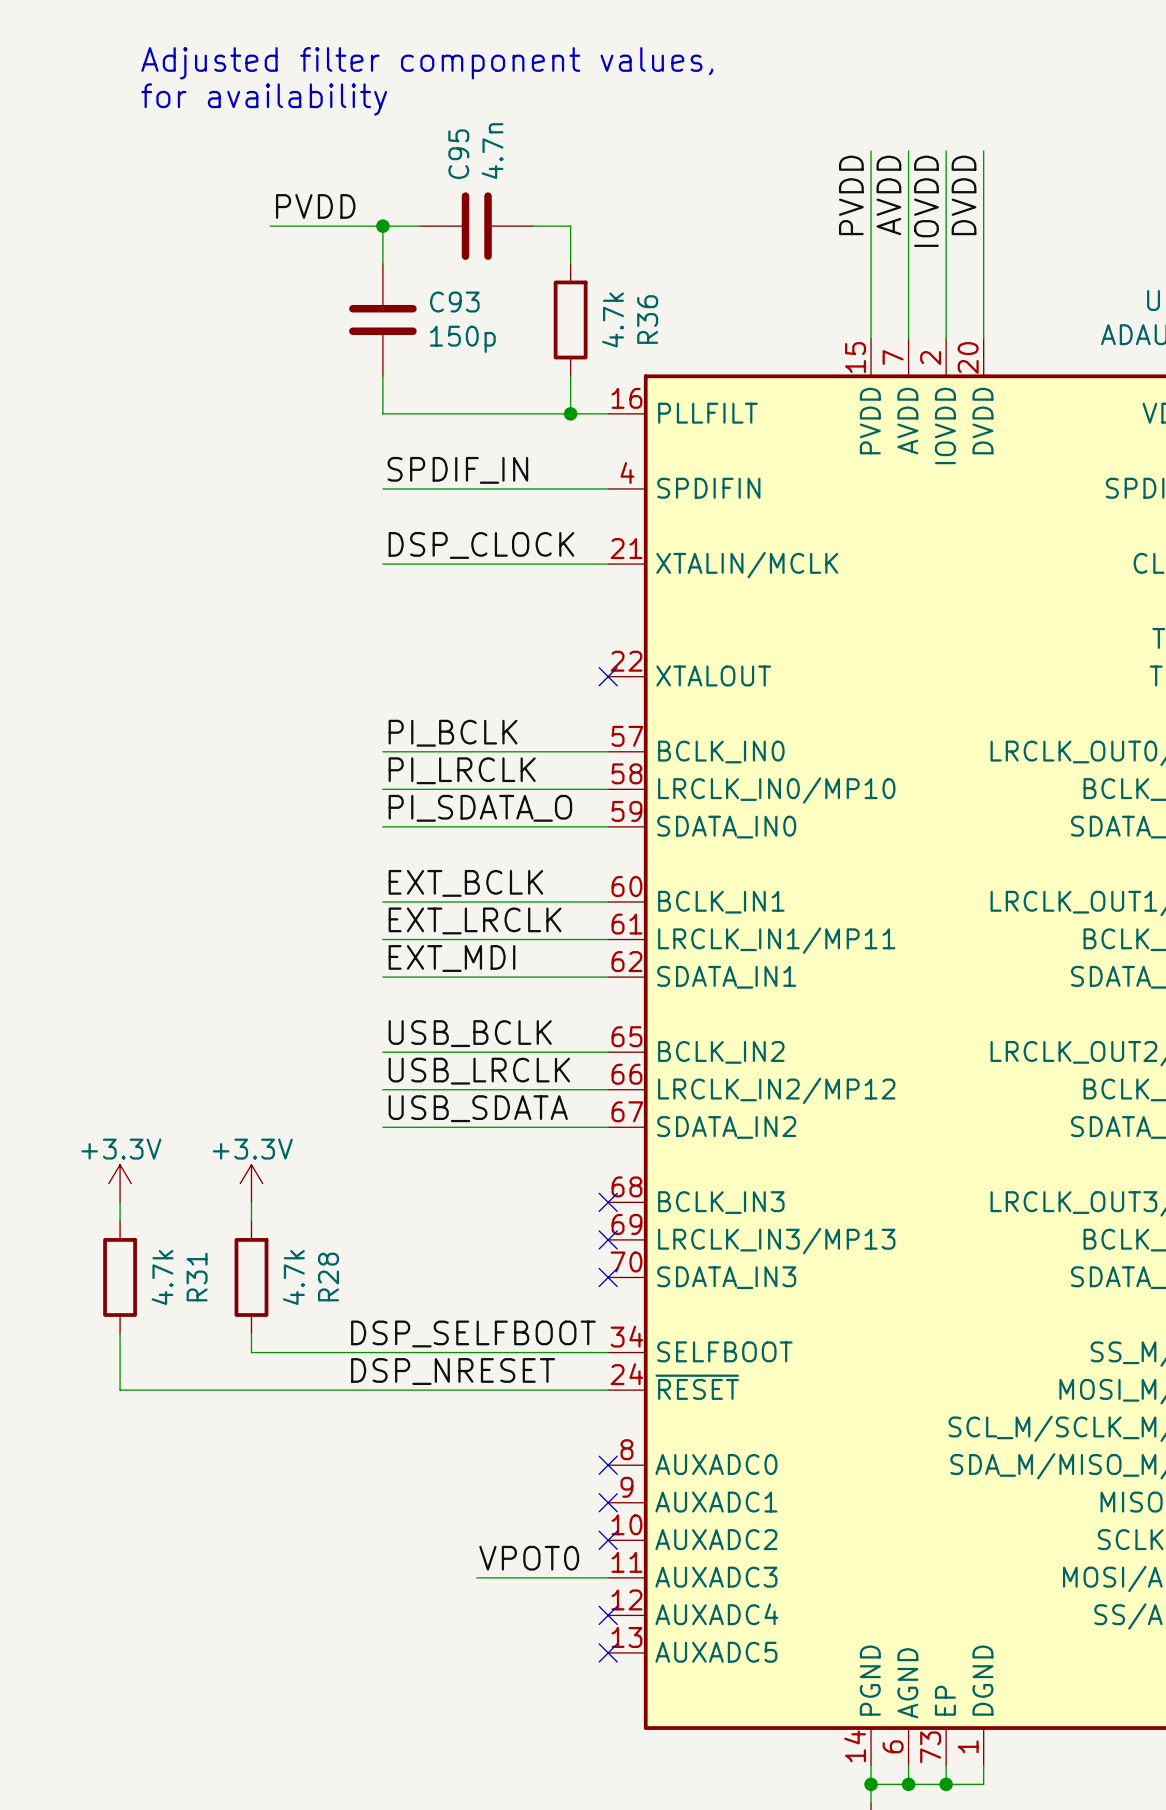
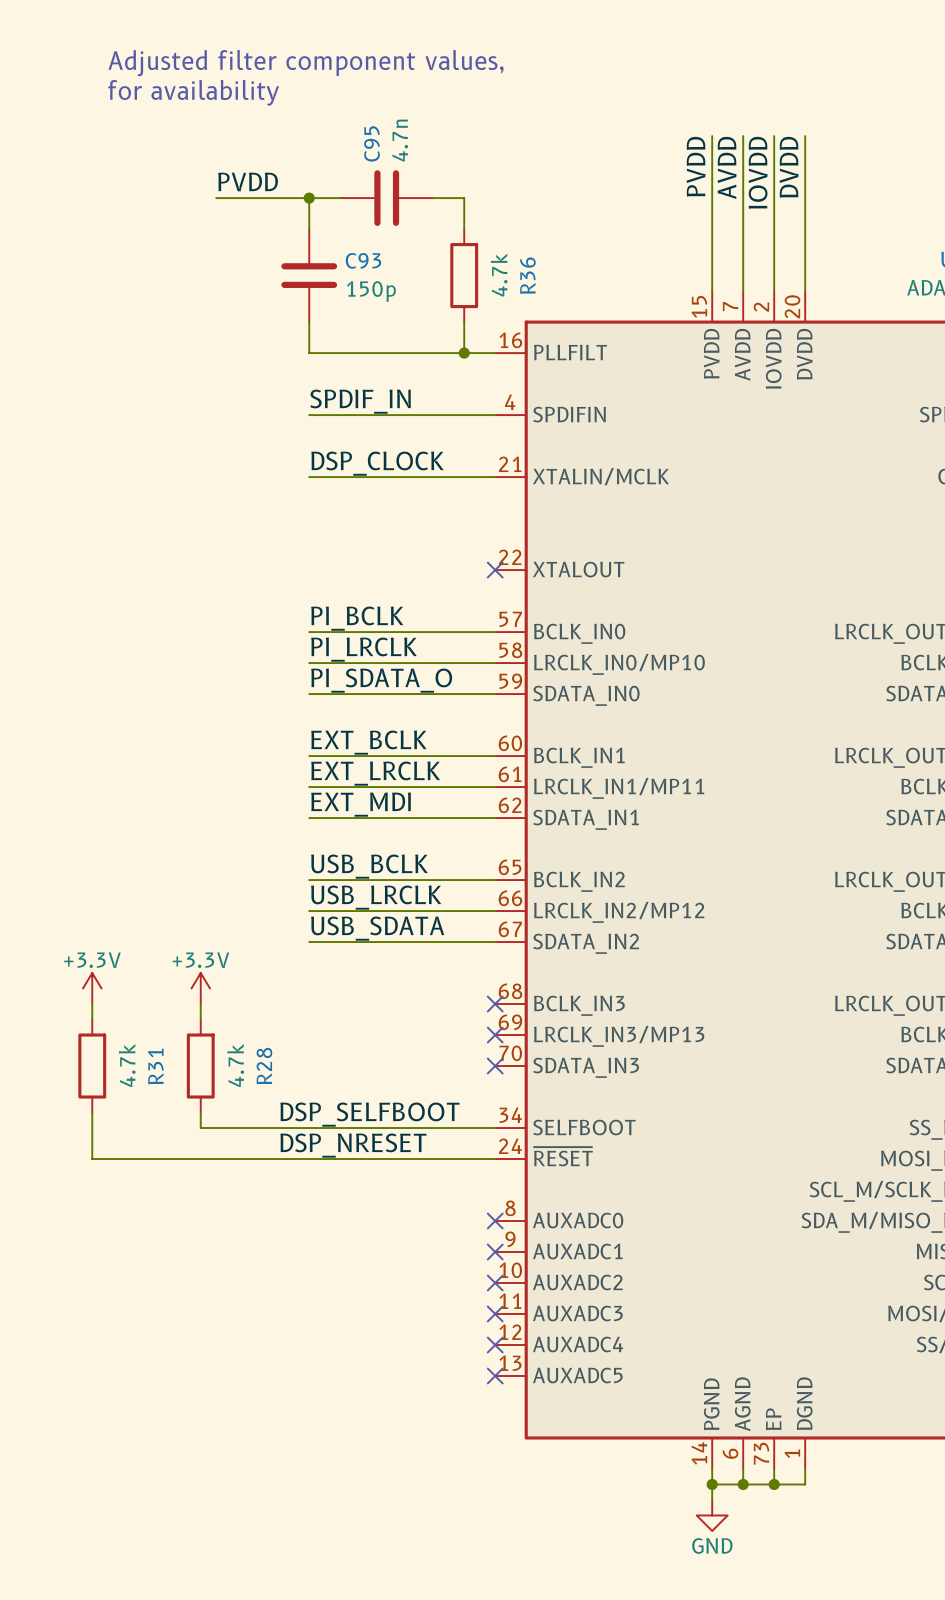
label: VPOT0 (529, 1558) -> none
wire: (476, 1577) (608, 1577) -> none
no-connect mark: none -> (495, 1313)

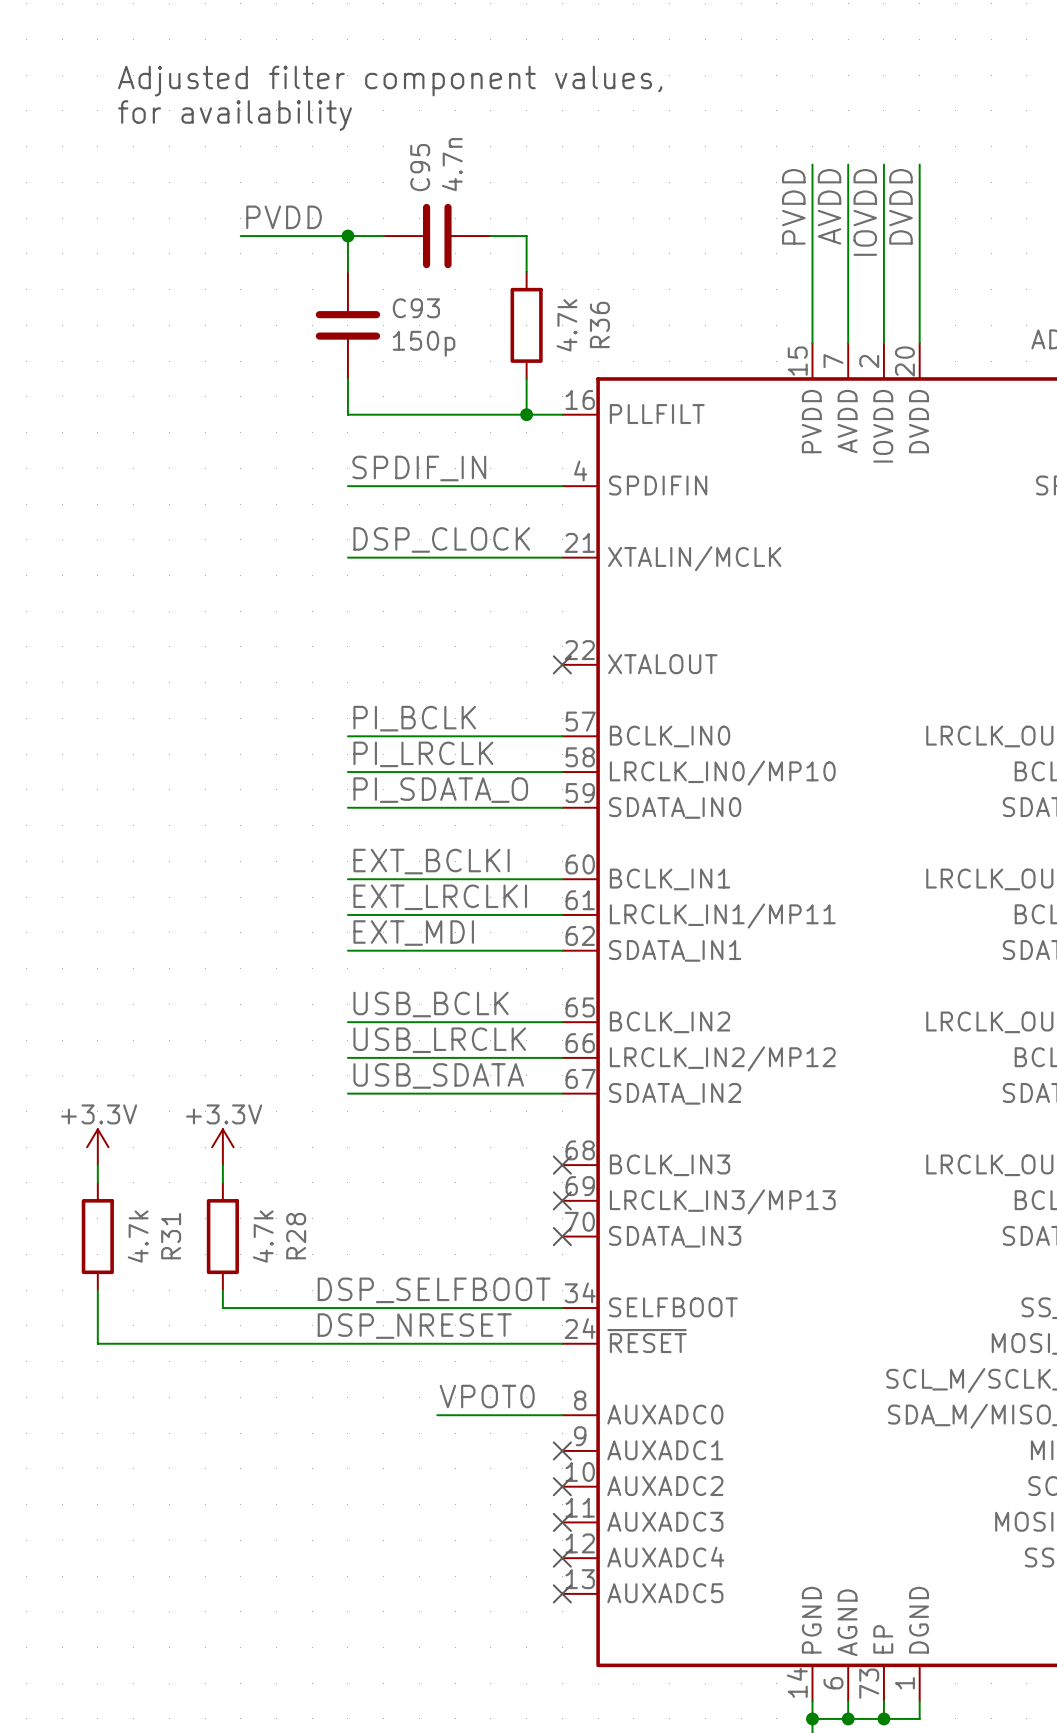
label: EXT_BCLK (368, 742) -> EXT_BCLKI (431, 861)
label: EXT_LRCLK (375, 773) -> EXT_LRCLKI (440, 897)
label: none -> VPOT0 (487, 1396)
wire: none -> (437, 1415) (562, 1415)
no-connect mark: (495, 1221) -> none

